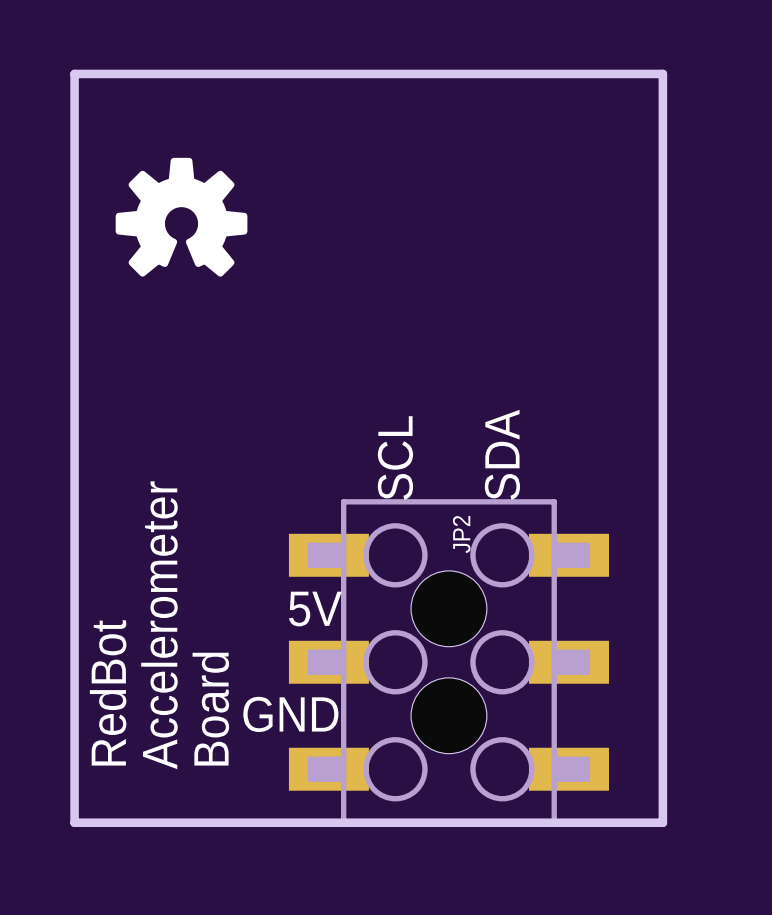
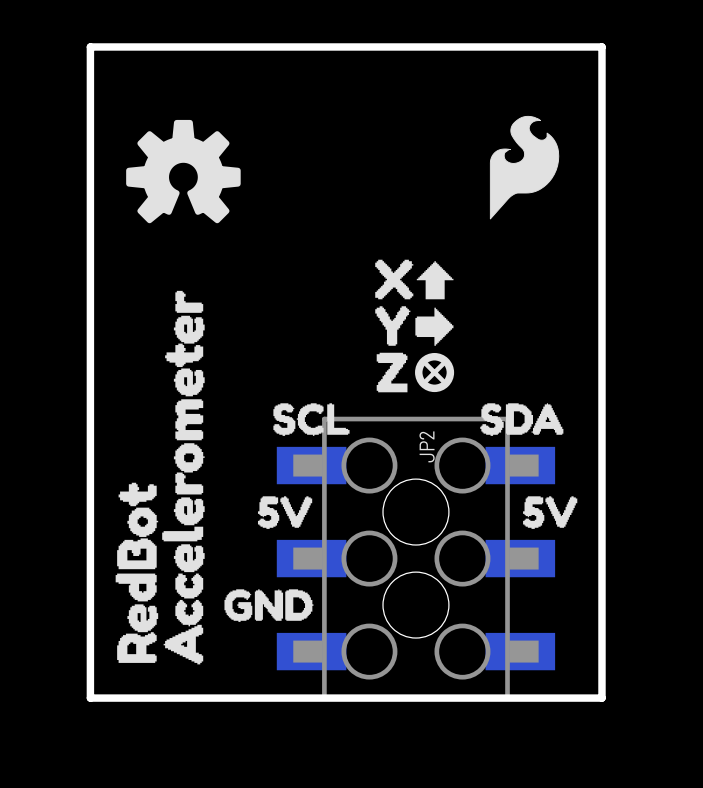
drawing: none -> [489, 115, 560, 220]
drawing: none -> [273, 259, 564, 436]
drawing: none -> [115, 290, 314, 665]
line: none -> (425, 363) (443, 381)
line: none -> (443, 363) (425, 381)
text: SDA (502, 454) -> none
text: SCL (395, 457) -> none
drawing: none -> [257, 496, 313, 529]
drawing: none -> [523, 496, 578, 529]
text: 5V (315, 609) -> none
text: Accelerometer (159, 625) -> none
text: RedBot (108, 692) -> none
text: Board (210, 709) -> none
text: GND (290, 714) -> none

